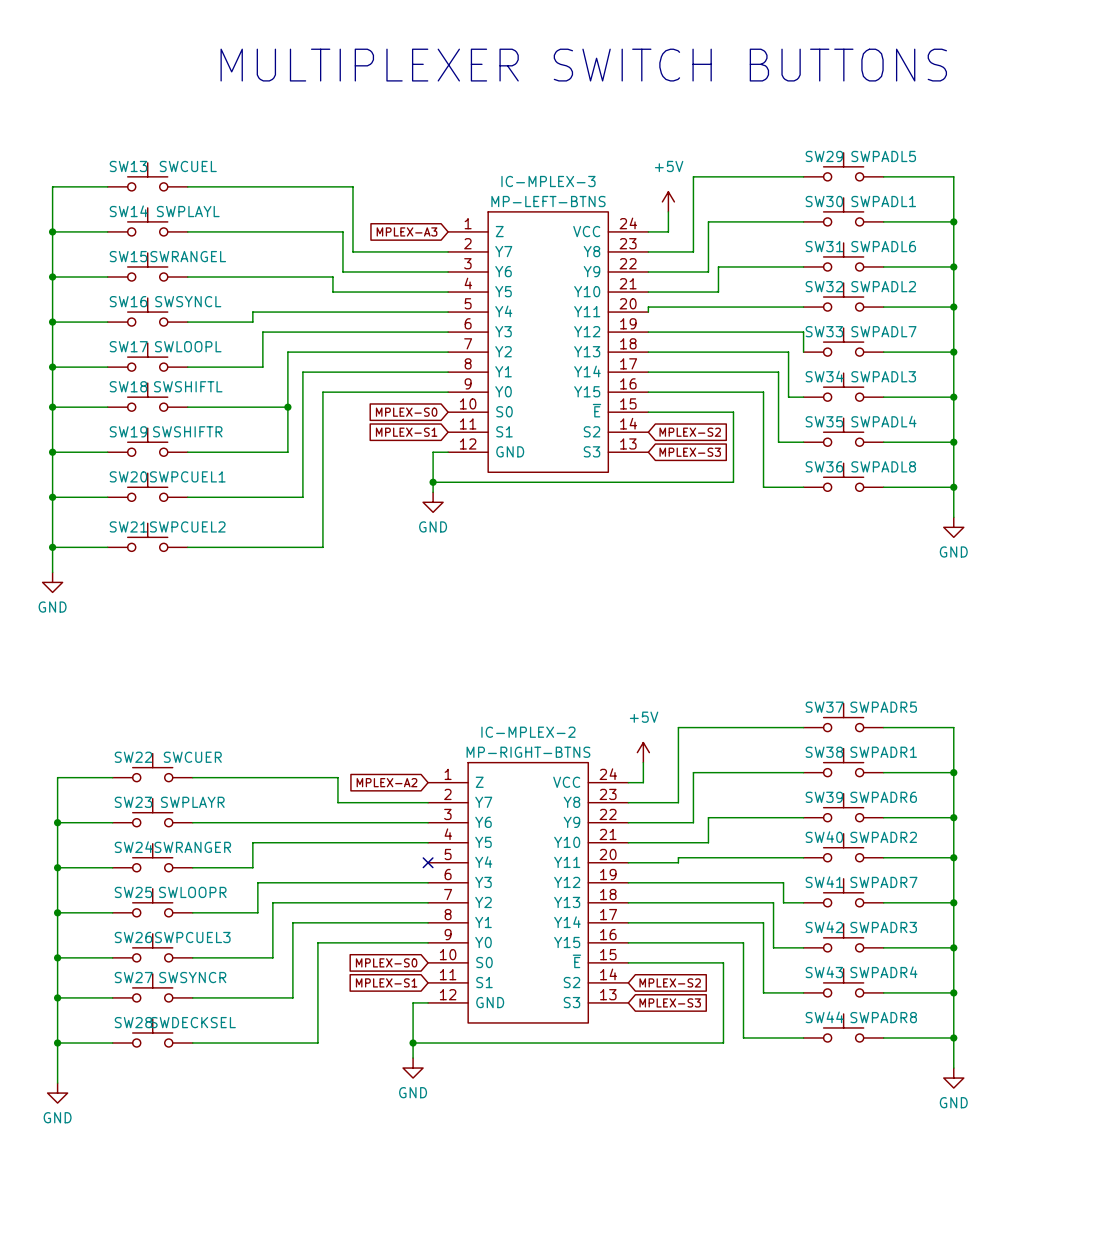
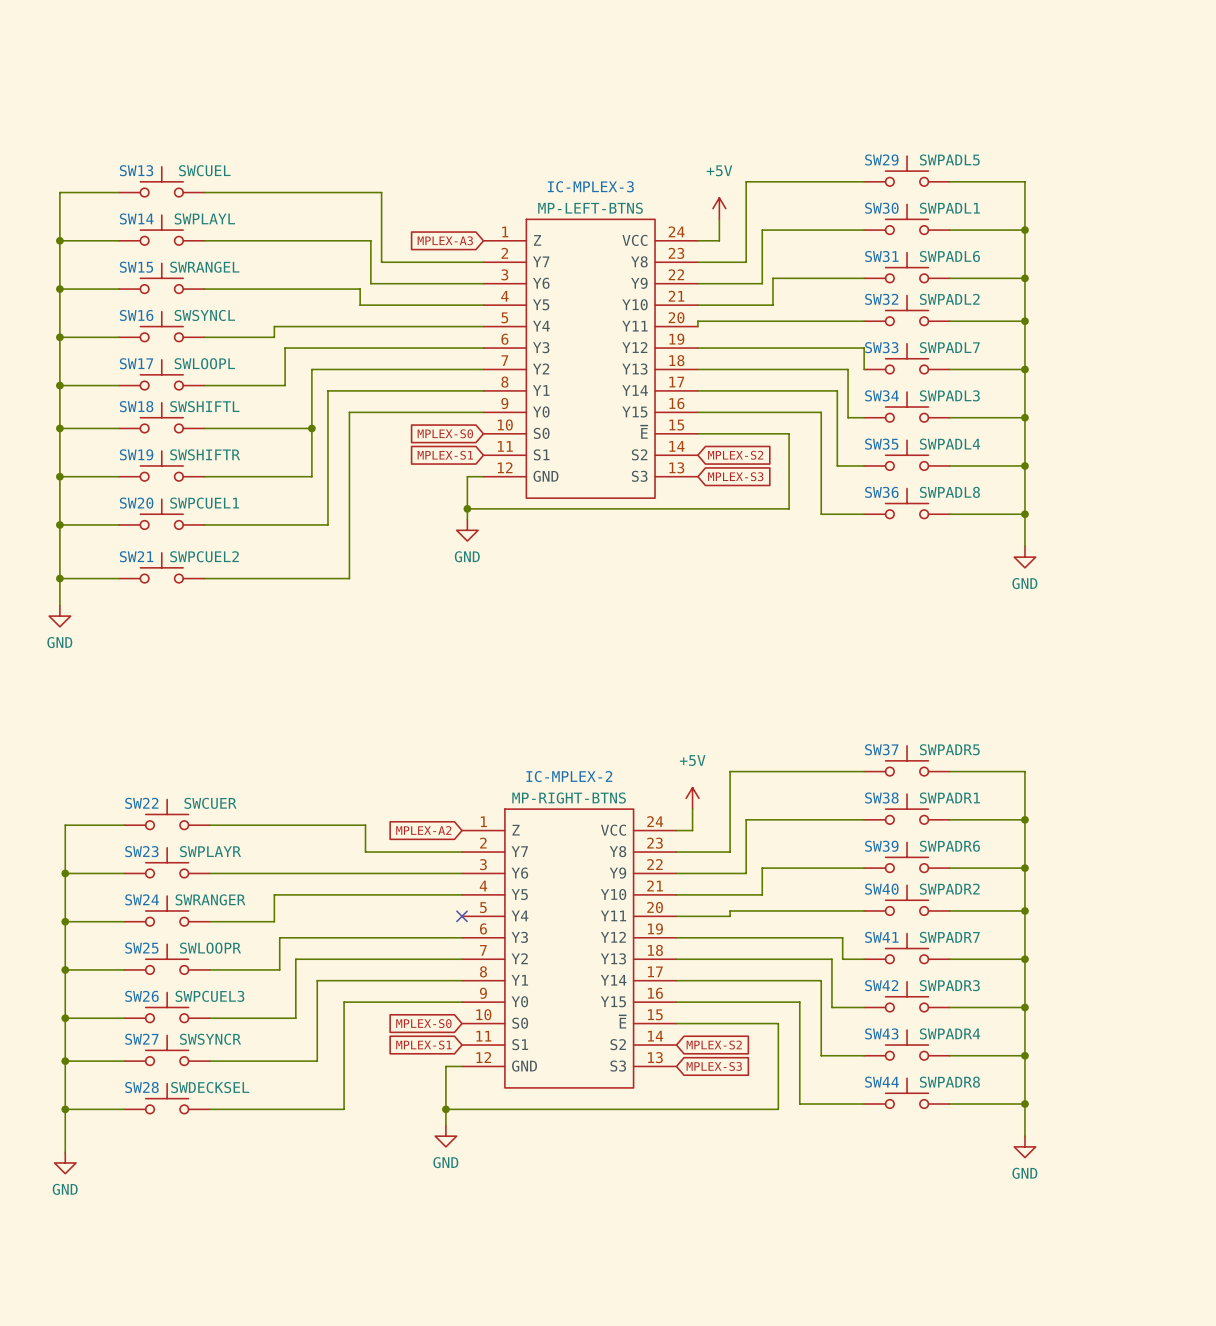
text: MULTIPLEXER SWITCH BUTTONS (583, 65) -> none

